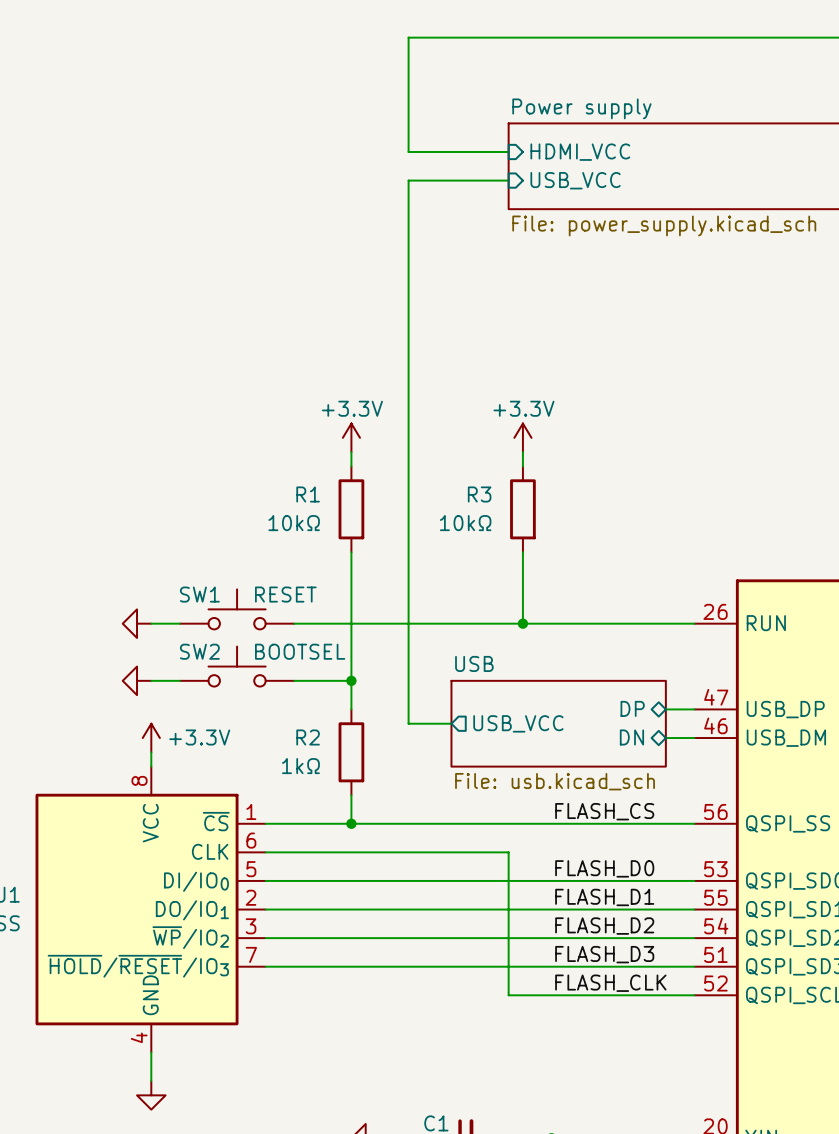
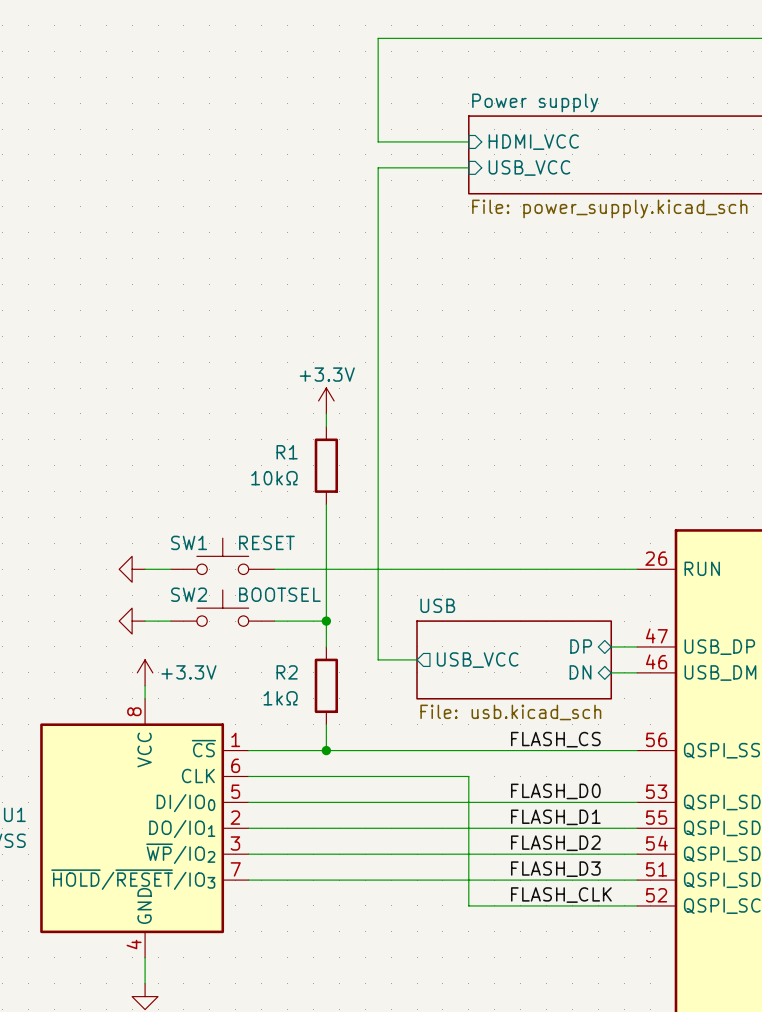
power symbol: +3.3V (522, 437) -> none
wire: (522, 452) (522, 466) -> none
R3: 10kΩ (522, 509) -> none
wire: (522, 552) (522, 623) -> none
junction: (522, 623) -> none

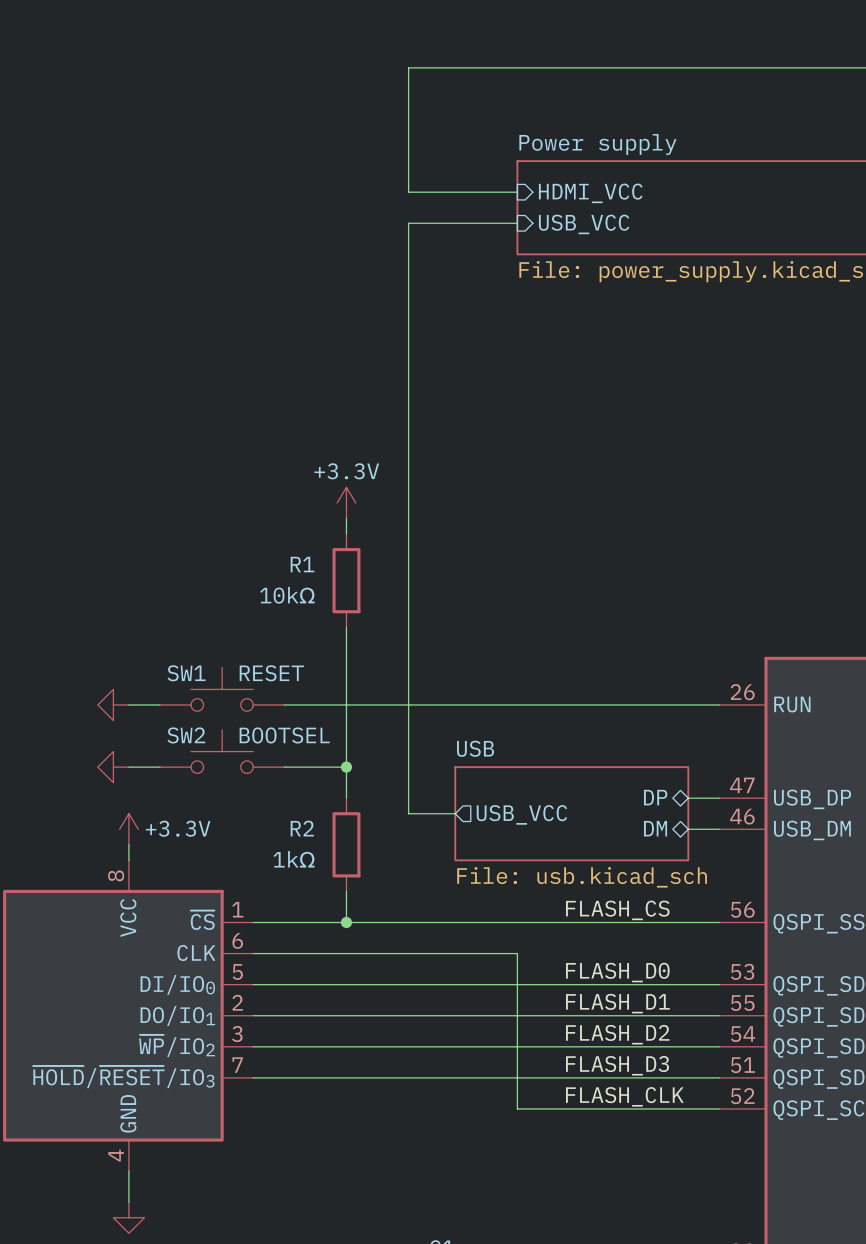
sheet pin: DN (580, 672) -> DM (655, 828)

